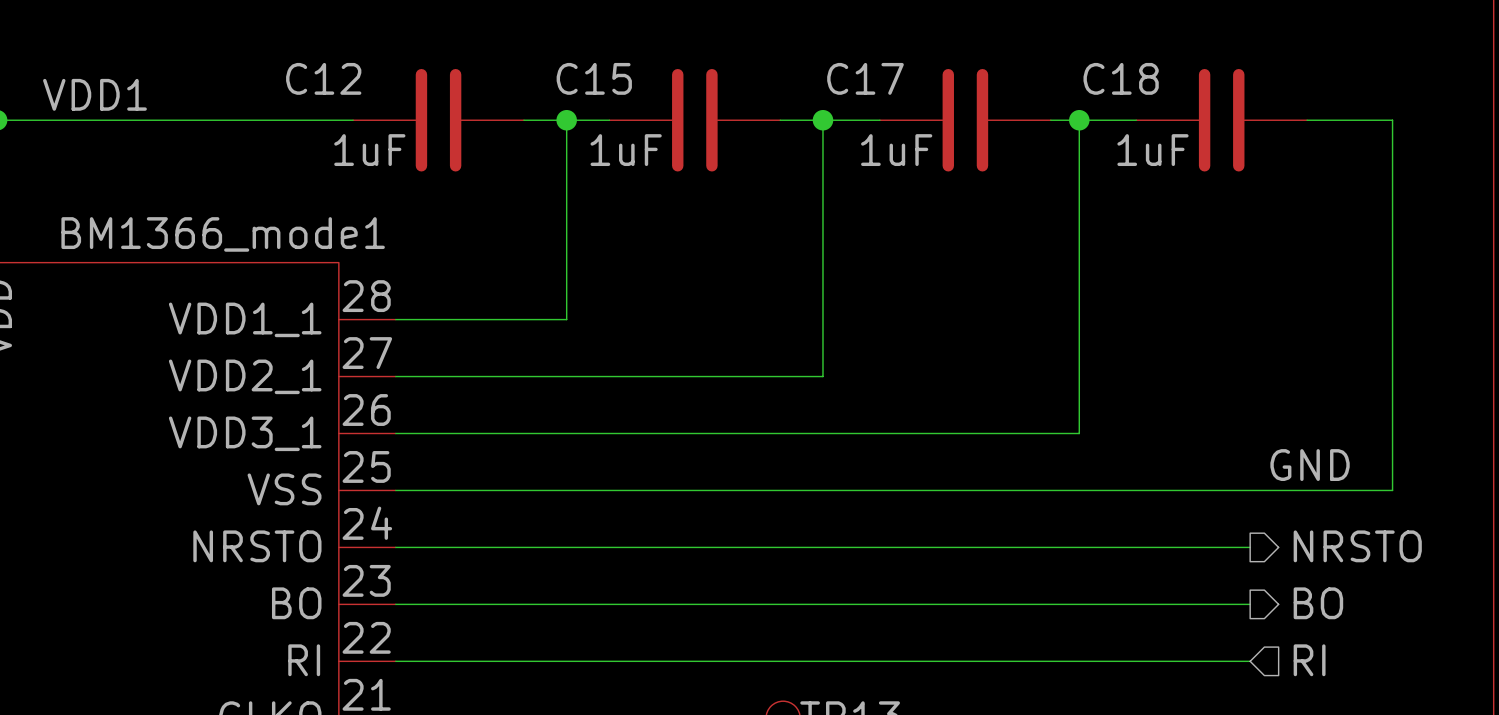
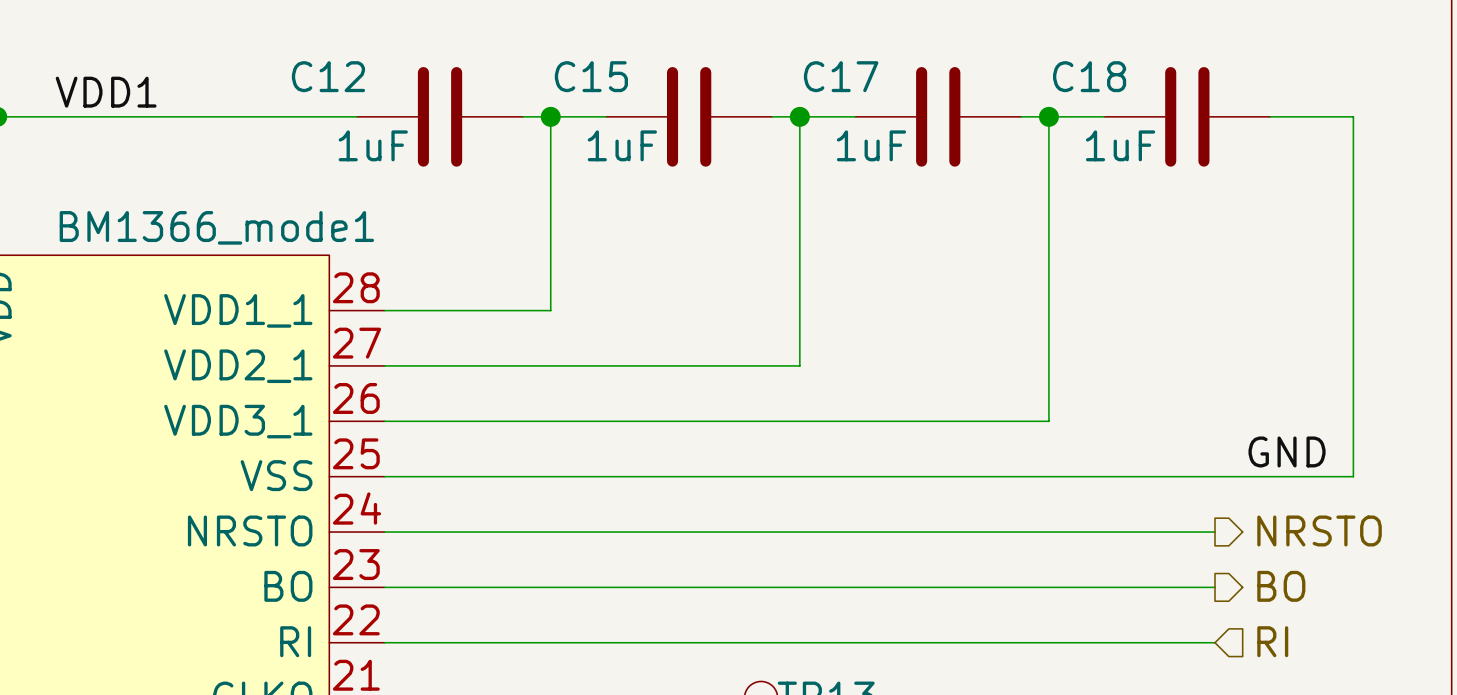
label position: VDD1 (94, 94) -> VDD1 (106, 92)
C12 position: (438, 120) -> (440, 116)
C15 position: (694, 120) -> (689, 116)
label position: GND (1310, 465) -> GND (1287, 451)

